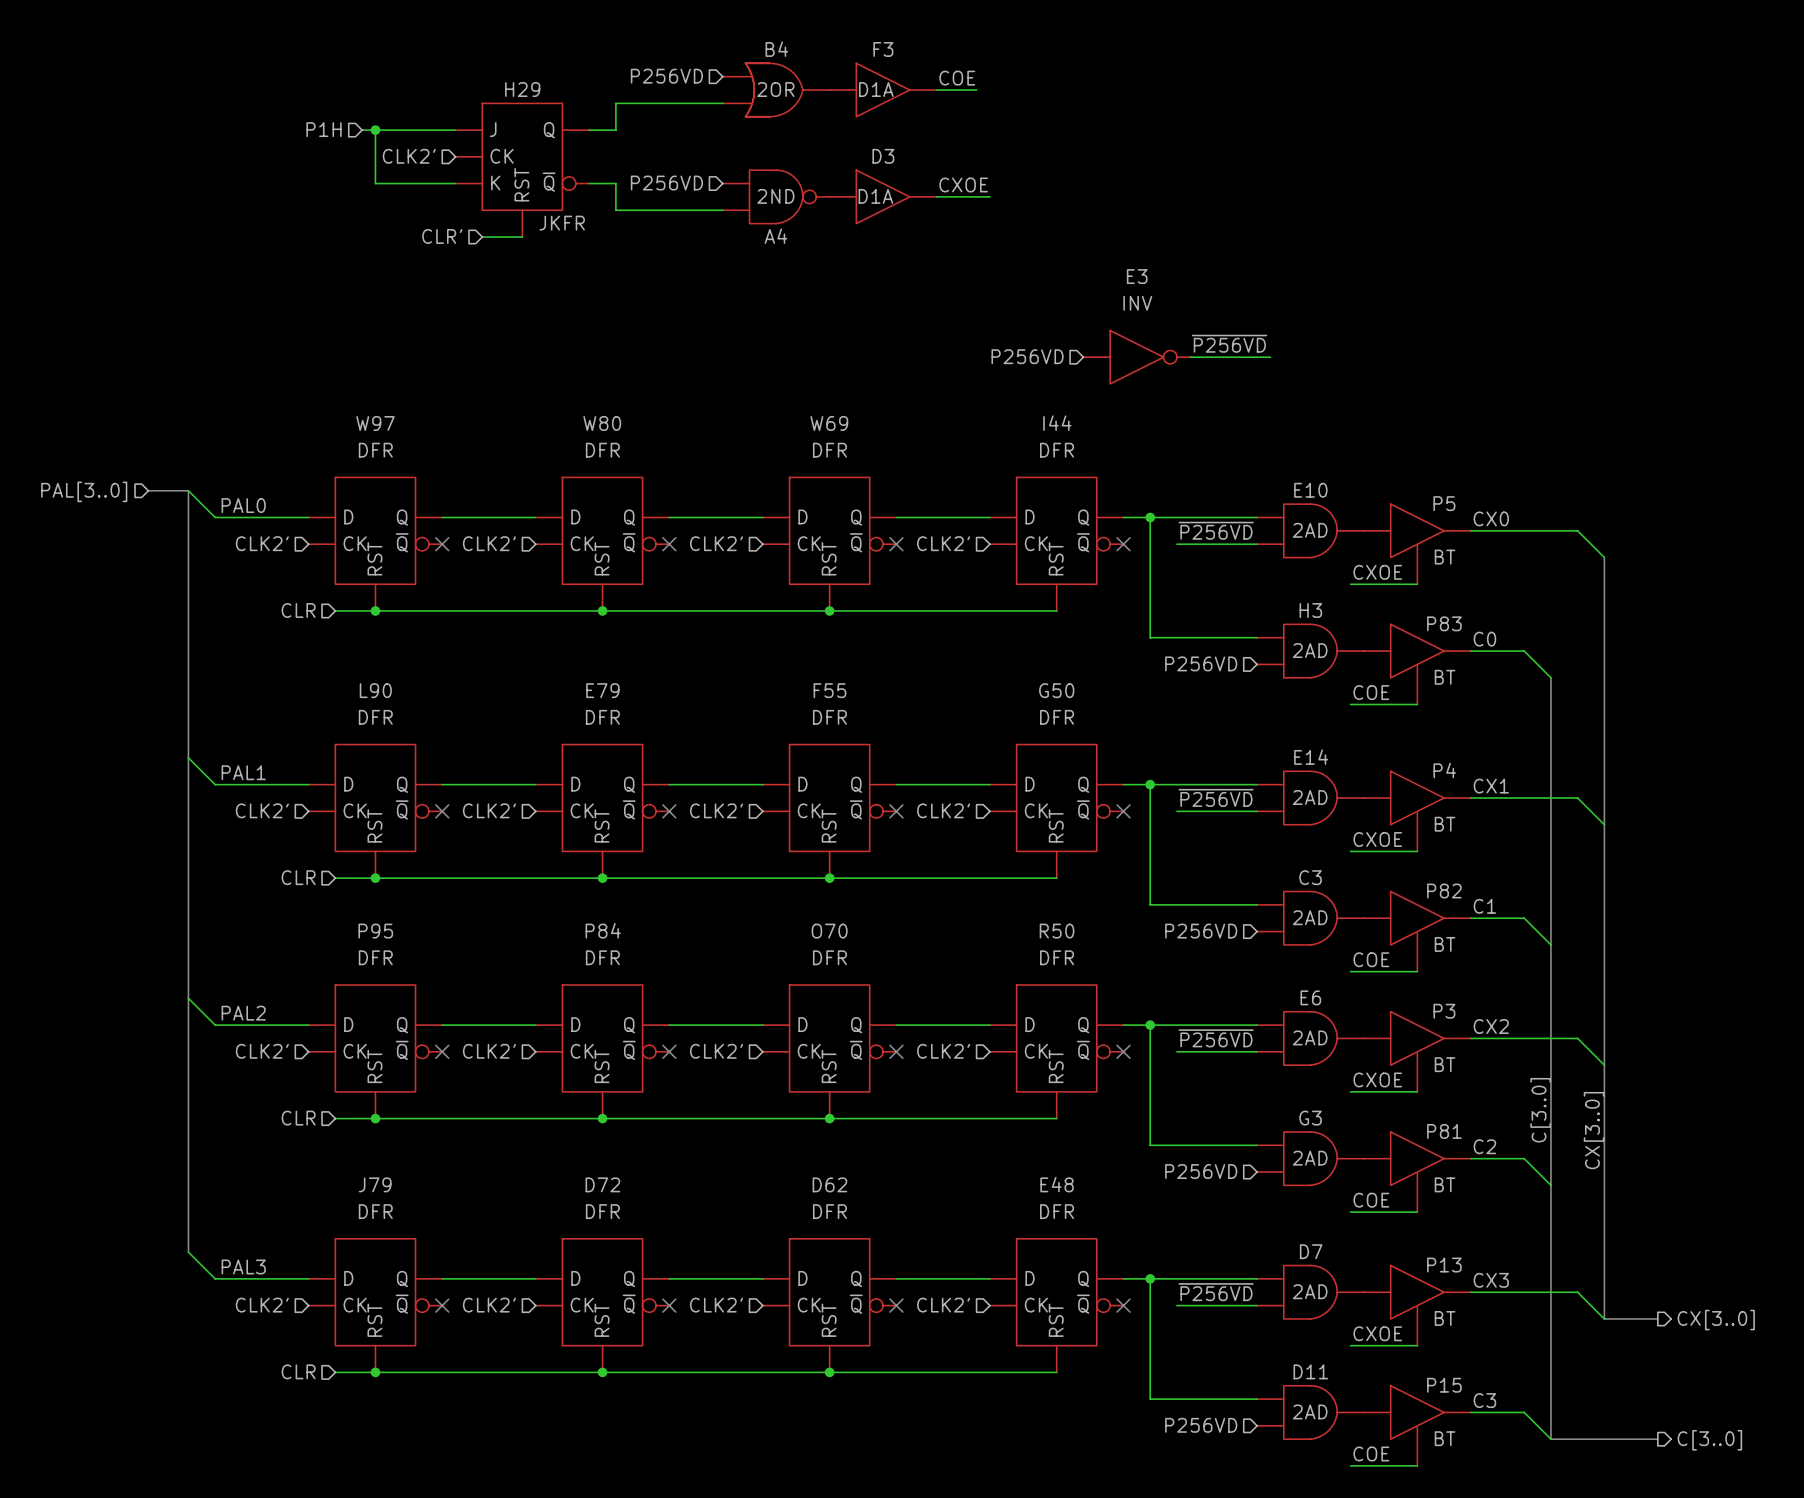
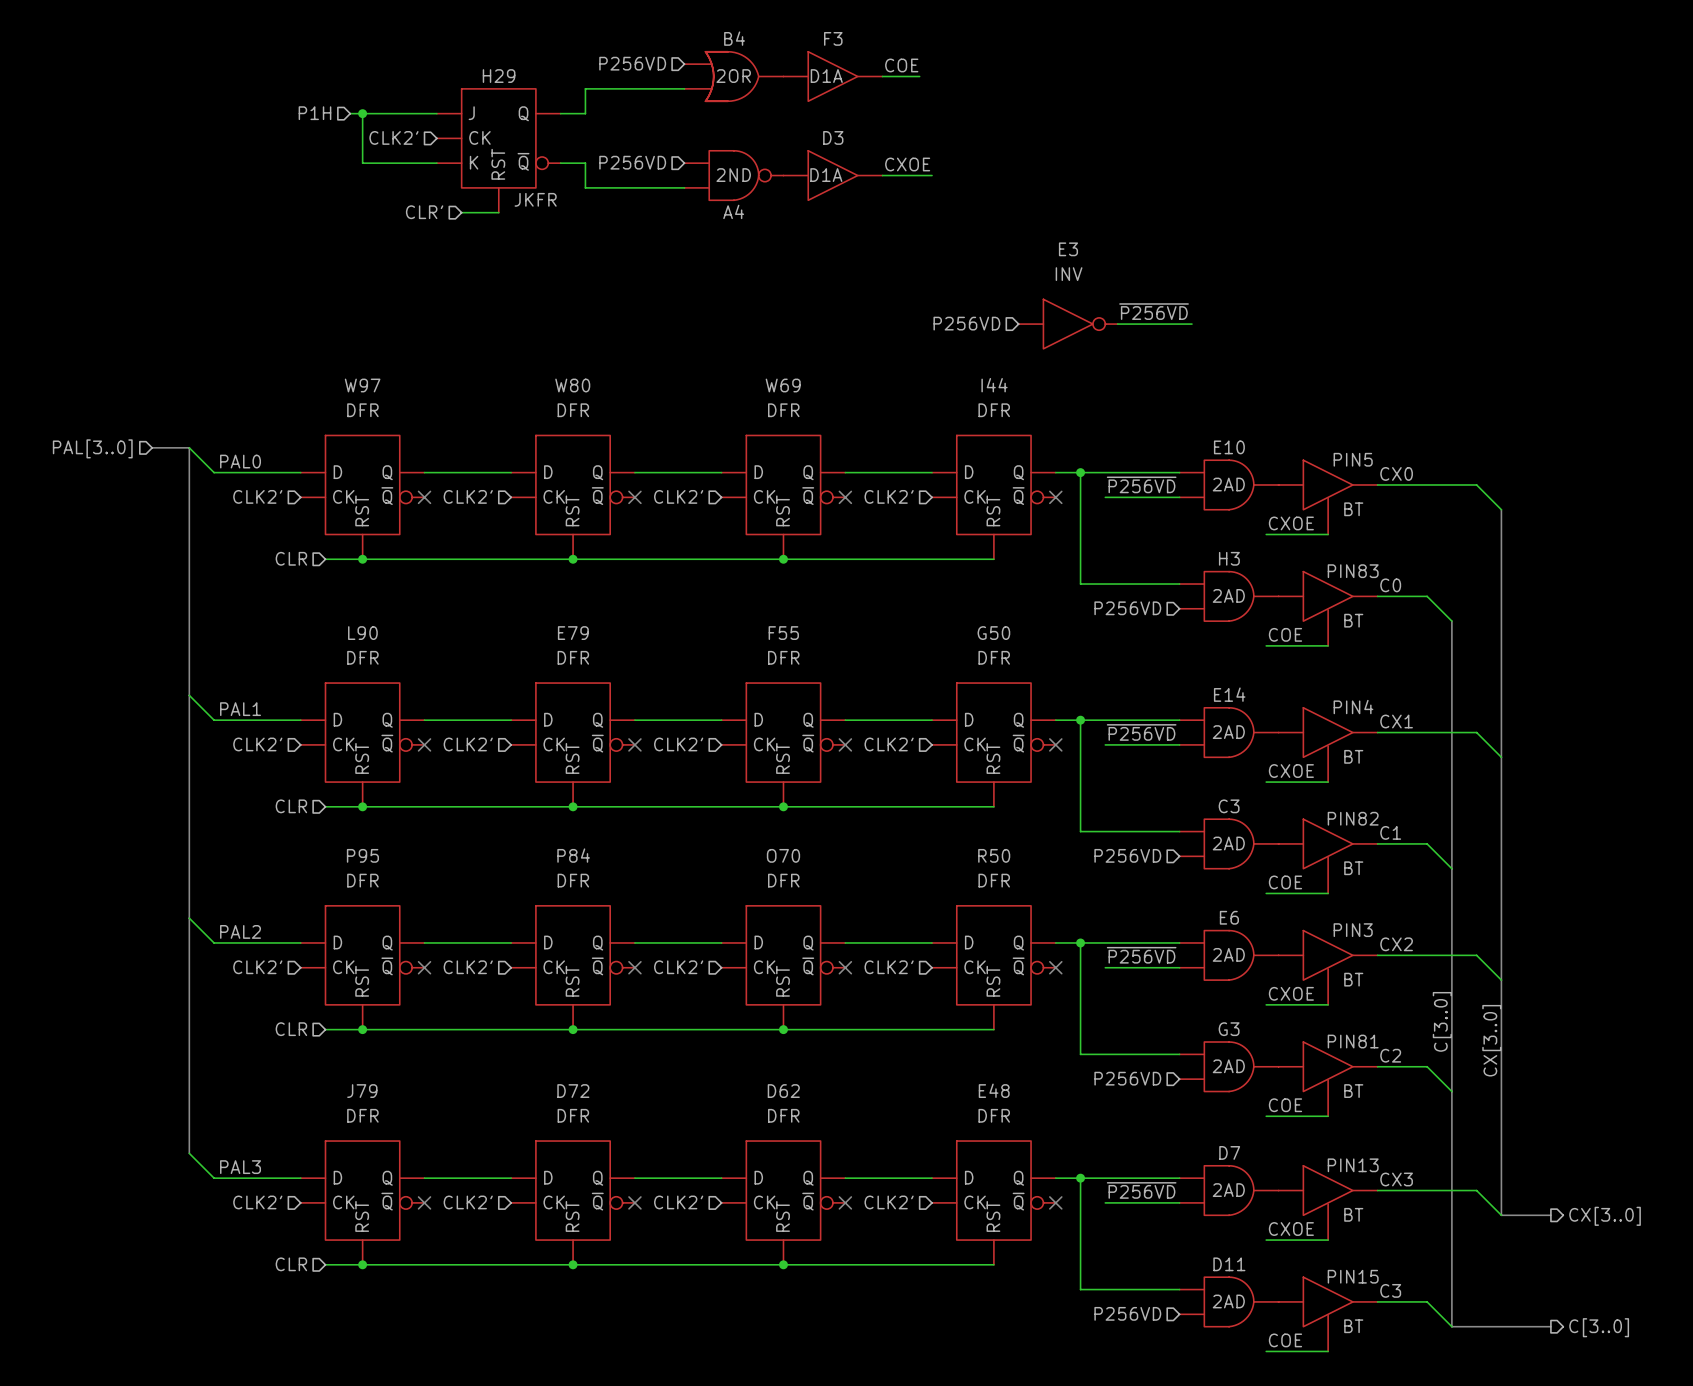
P5 name: P5 (1444, 503) -> PIN5 (1353, 459)
P83 name: P83 (1444, 623) -> PIN83 (1353, 571)
P4 name: P4 (1444, 770) -> PIN4 (1353, 707)
P82 name: P82 (1444, 891) -> PIN82 (1353, 818)
P3 name: P3 (1444, 1011) -> PIN3 (1353, 930)
P81 name: P81 (1444, 1131) -> PIN81 (1353, 1041)
P13 name: P13 (1444, 1265) -> PIN13 (1353, 1165)
P15 name: P15 (1444, 1385) -> PIN15 (1353, 1276)

